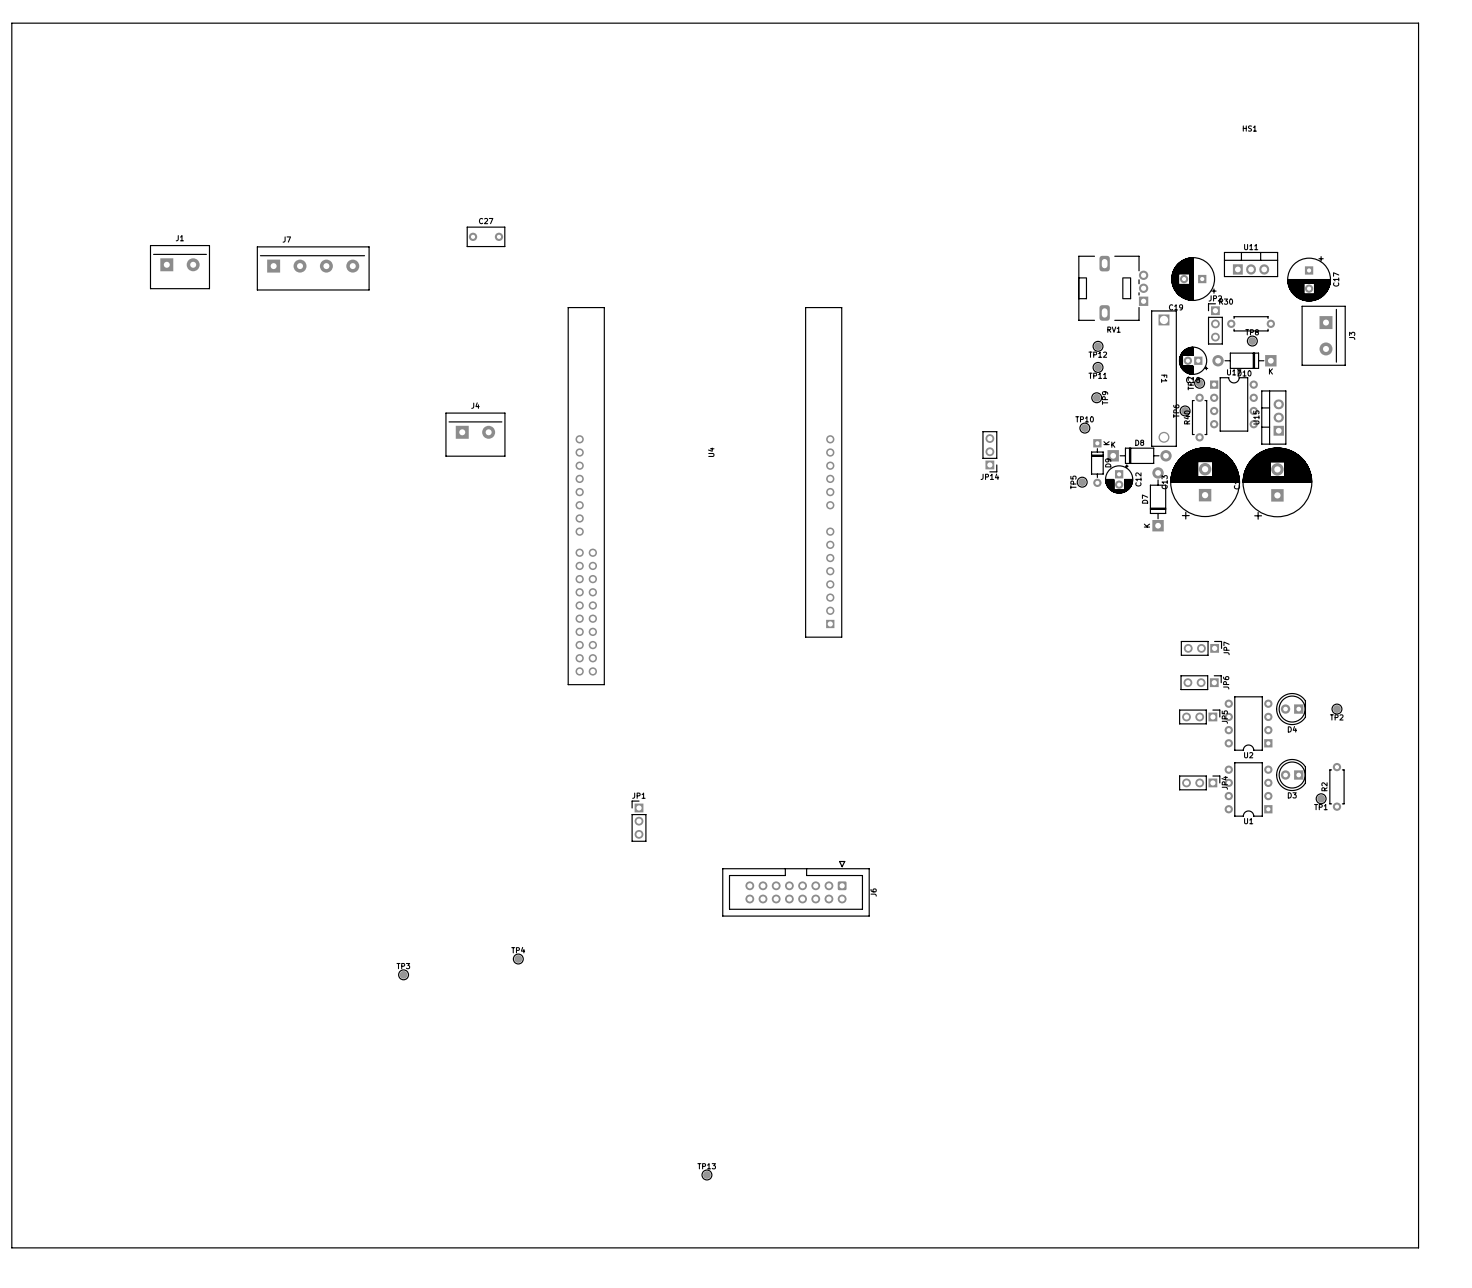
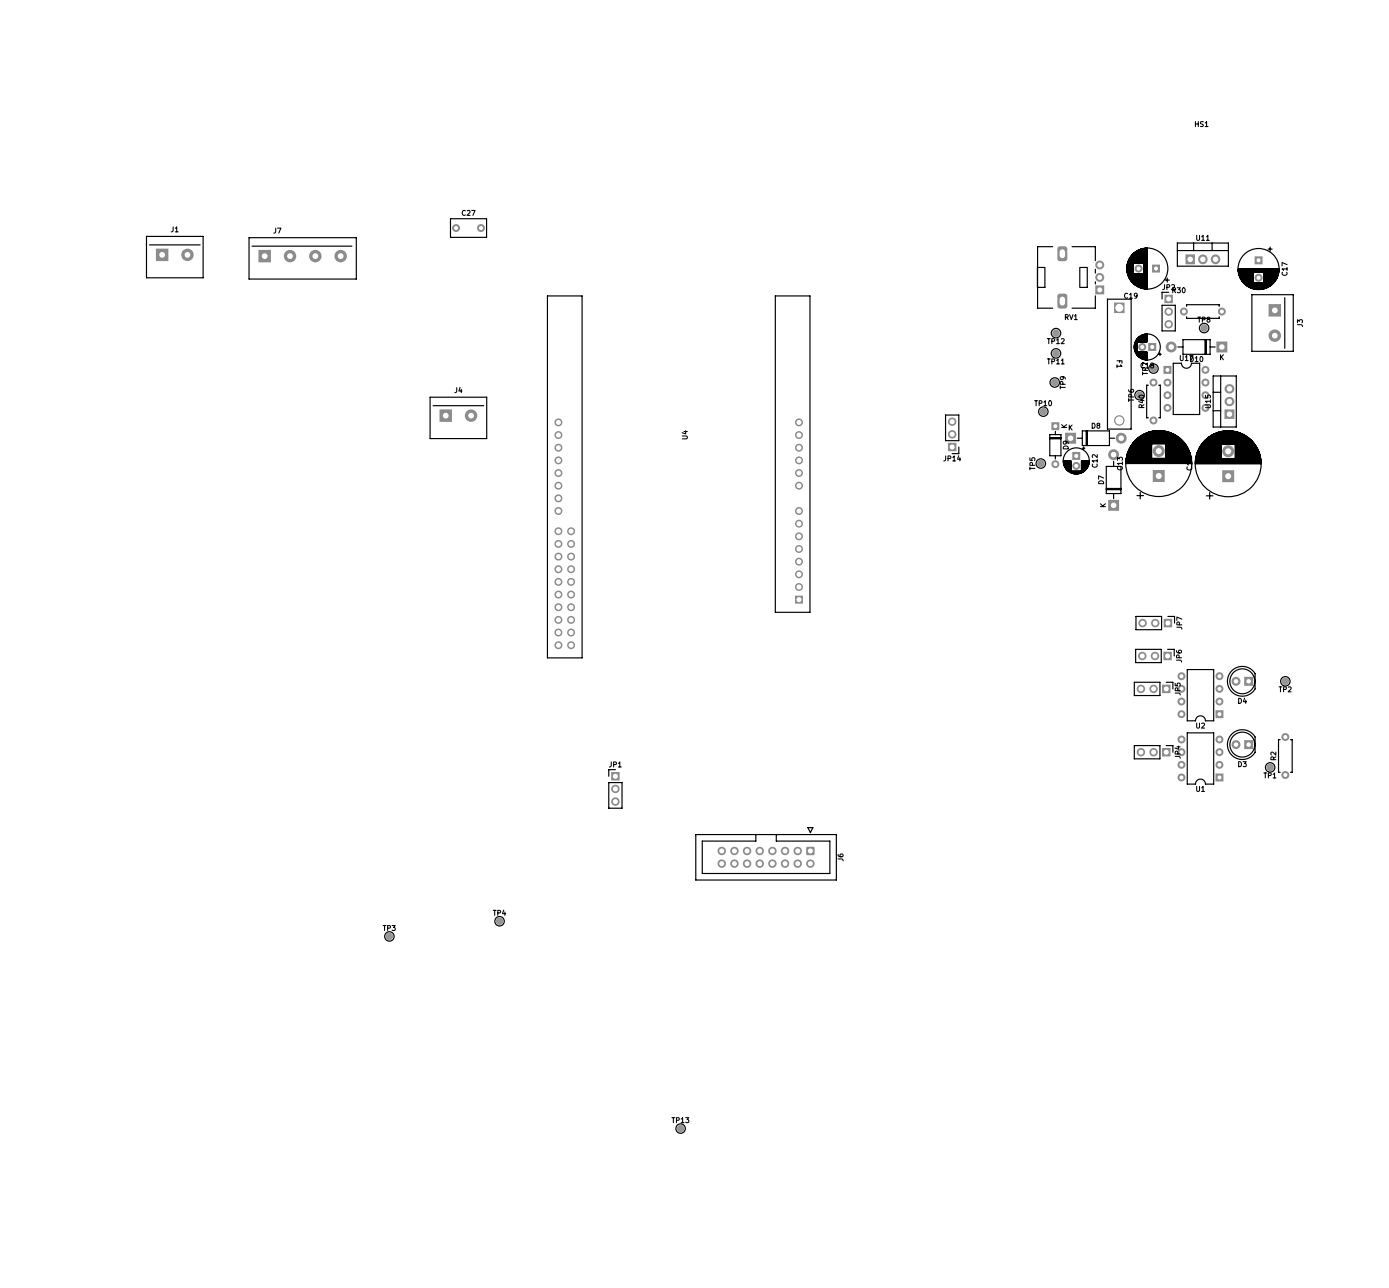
board edge: (11, 23) (1418, 23) (1418, 1247) (11, 1247) (11, 23) -> none

